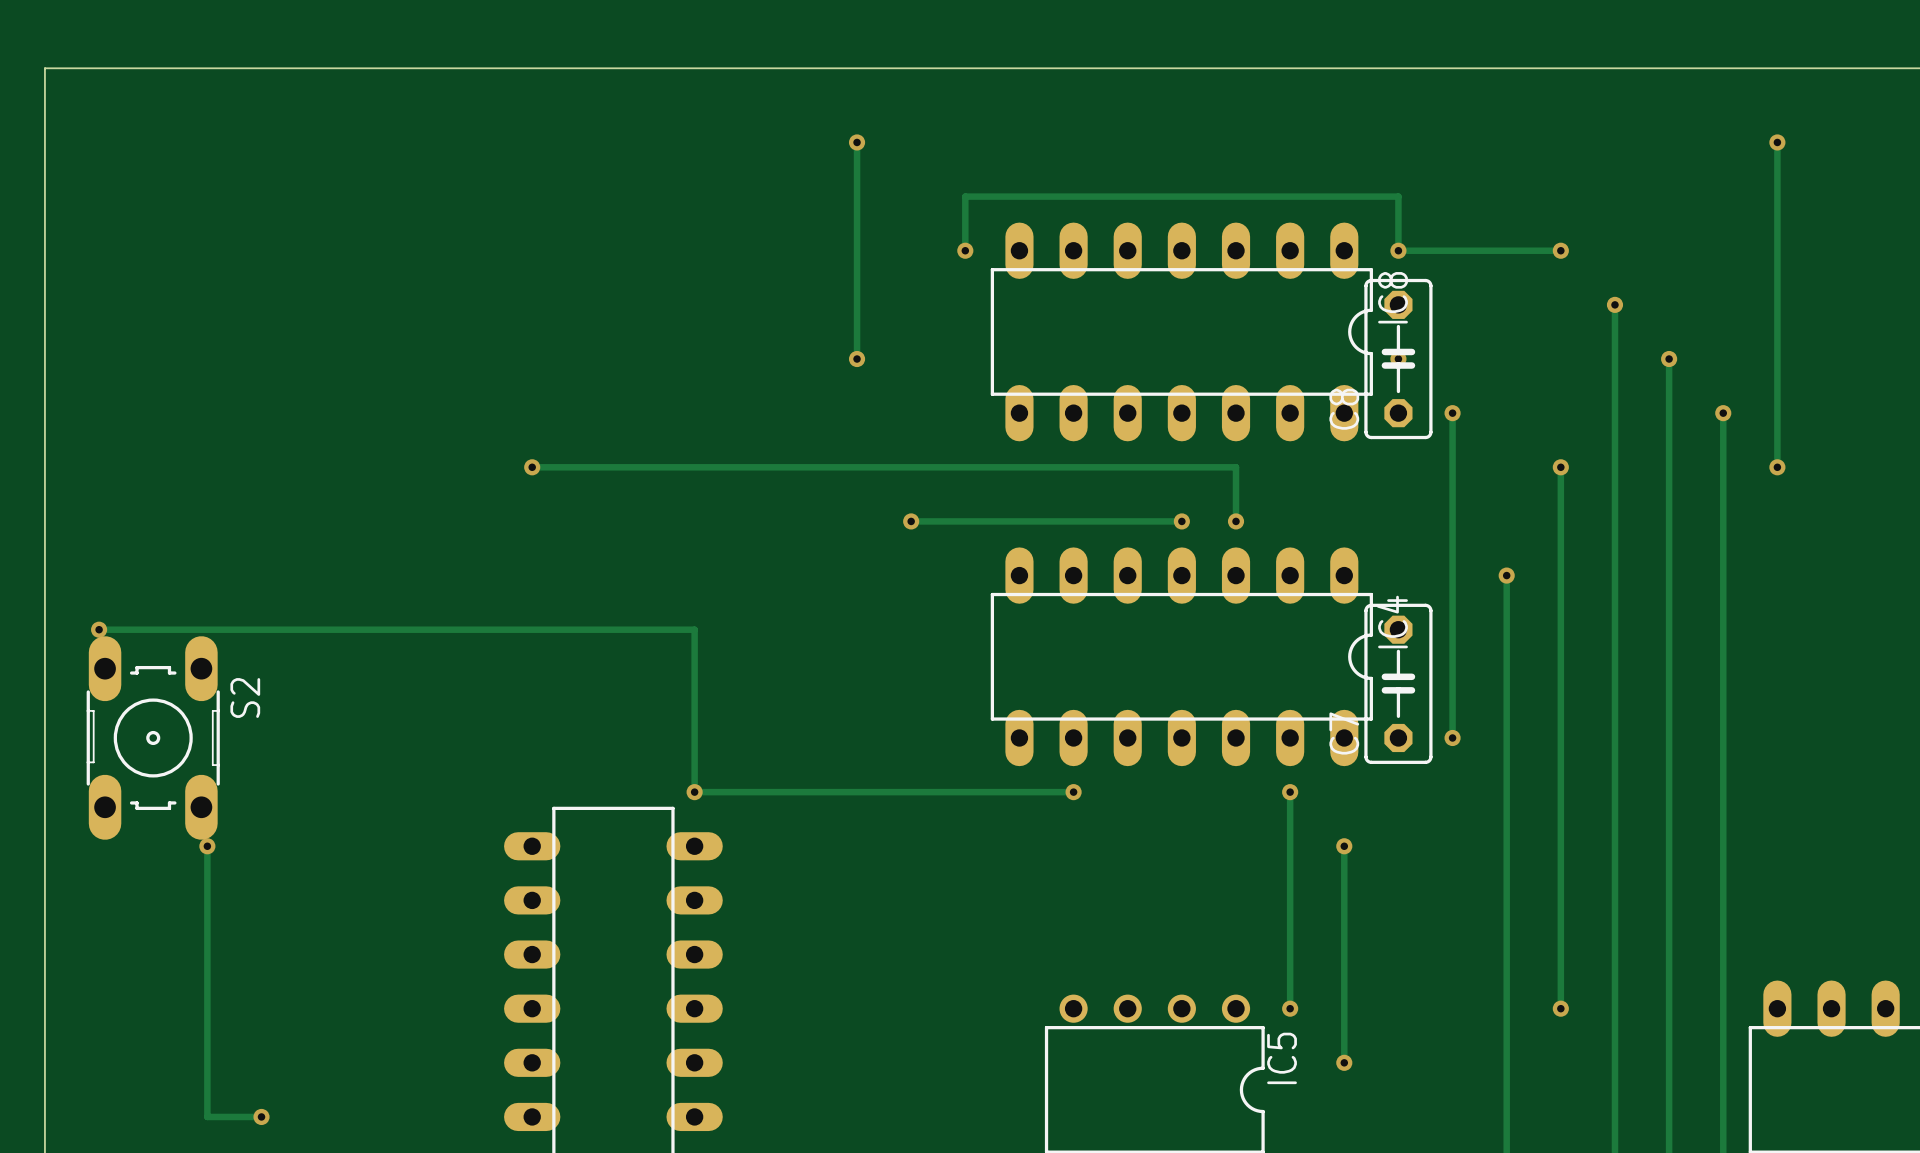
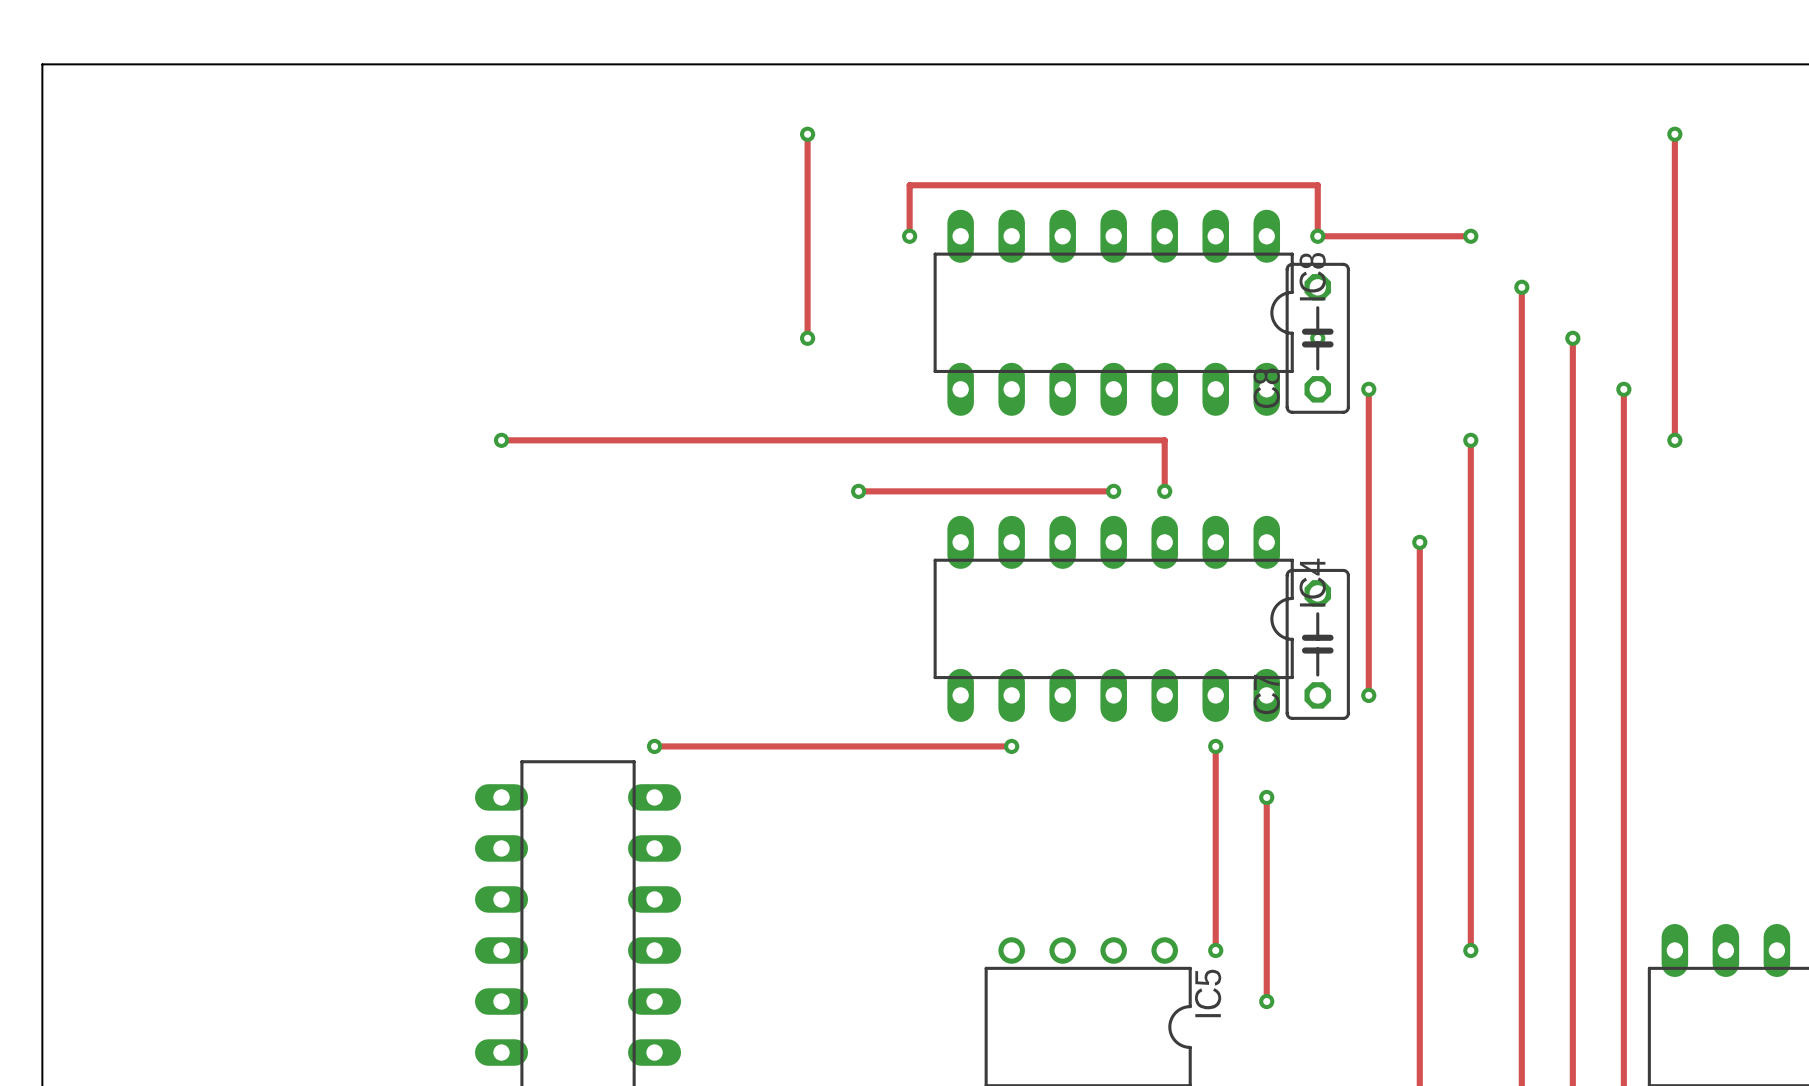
track: (99, 629) (694, 629) (694, 792) -> none
via: (99, 629) -> none
S2: (153, 737) -> none
track: (207, 846) (207, 1116) (261, 1116) -> none
via: (207, 846) -> none
via: (261, 1116) -> none

